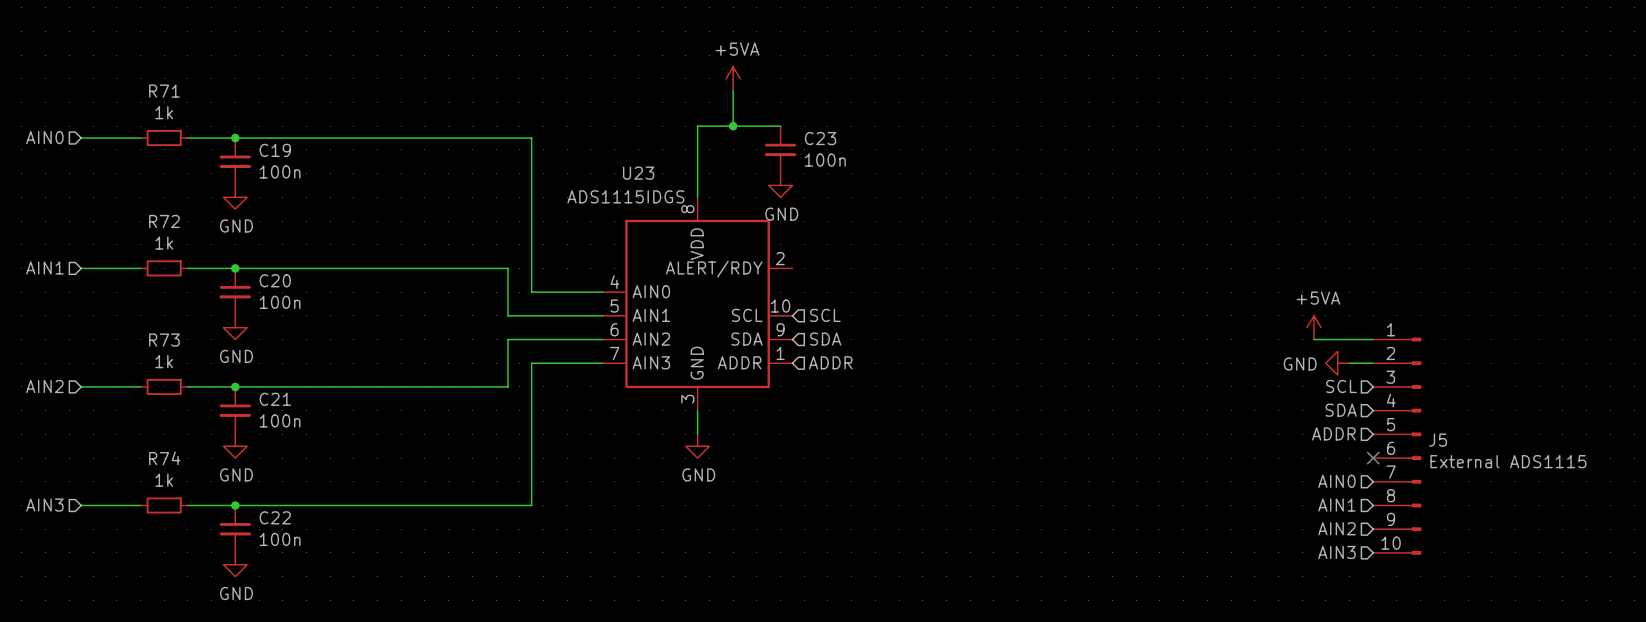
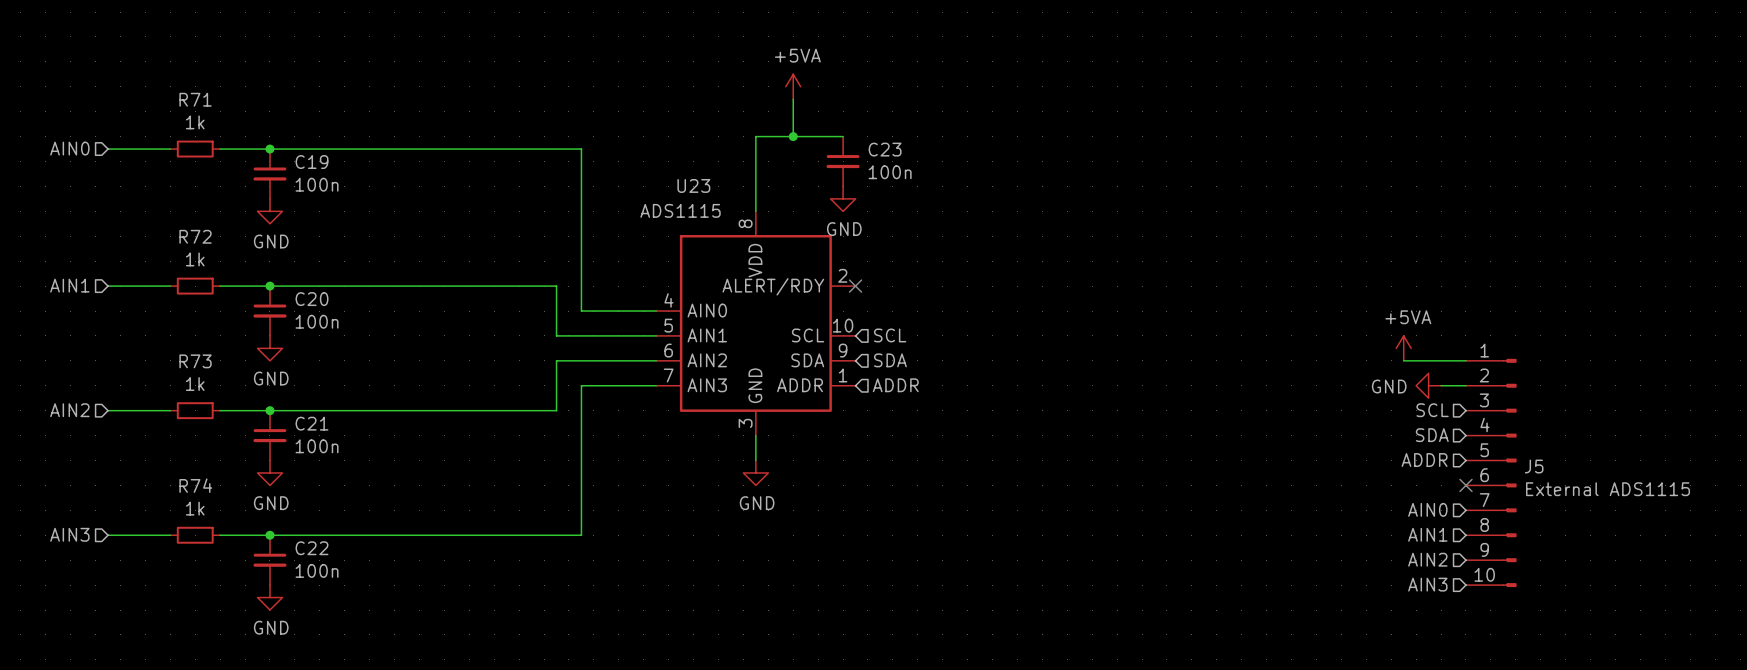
U23 value: ADS1115IDGS (625, 196) -> ADS1115 (680, 210)
no-connect mark: none -> (855, 286)

